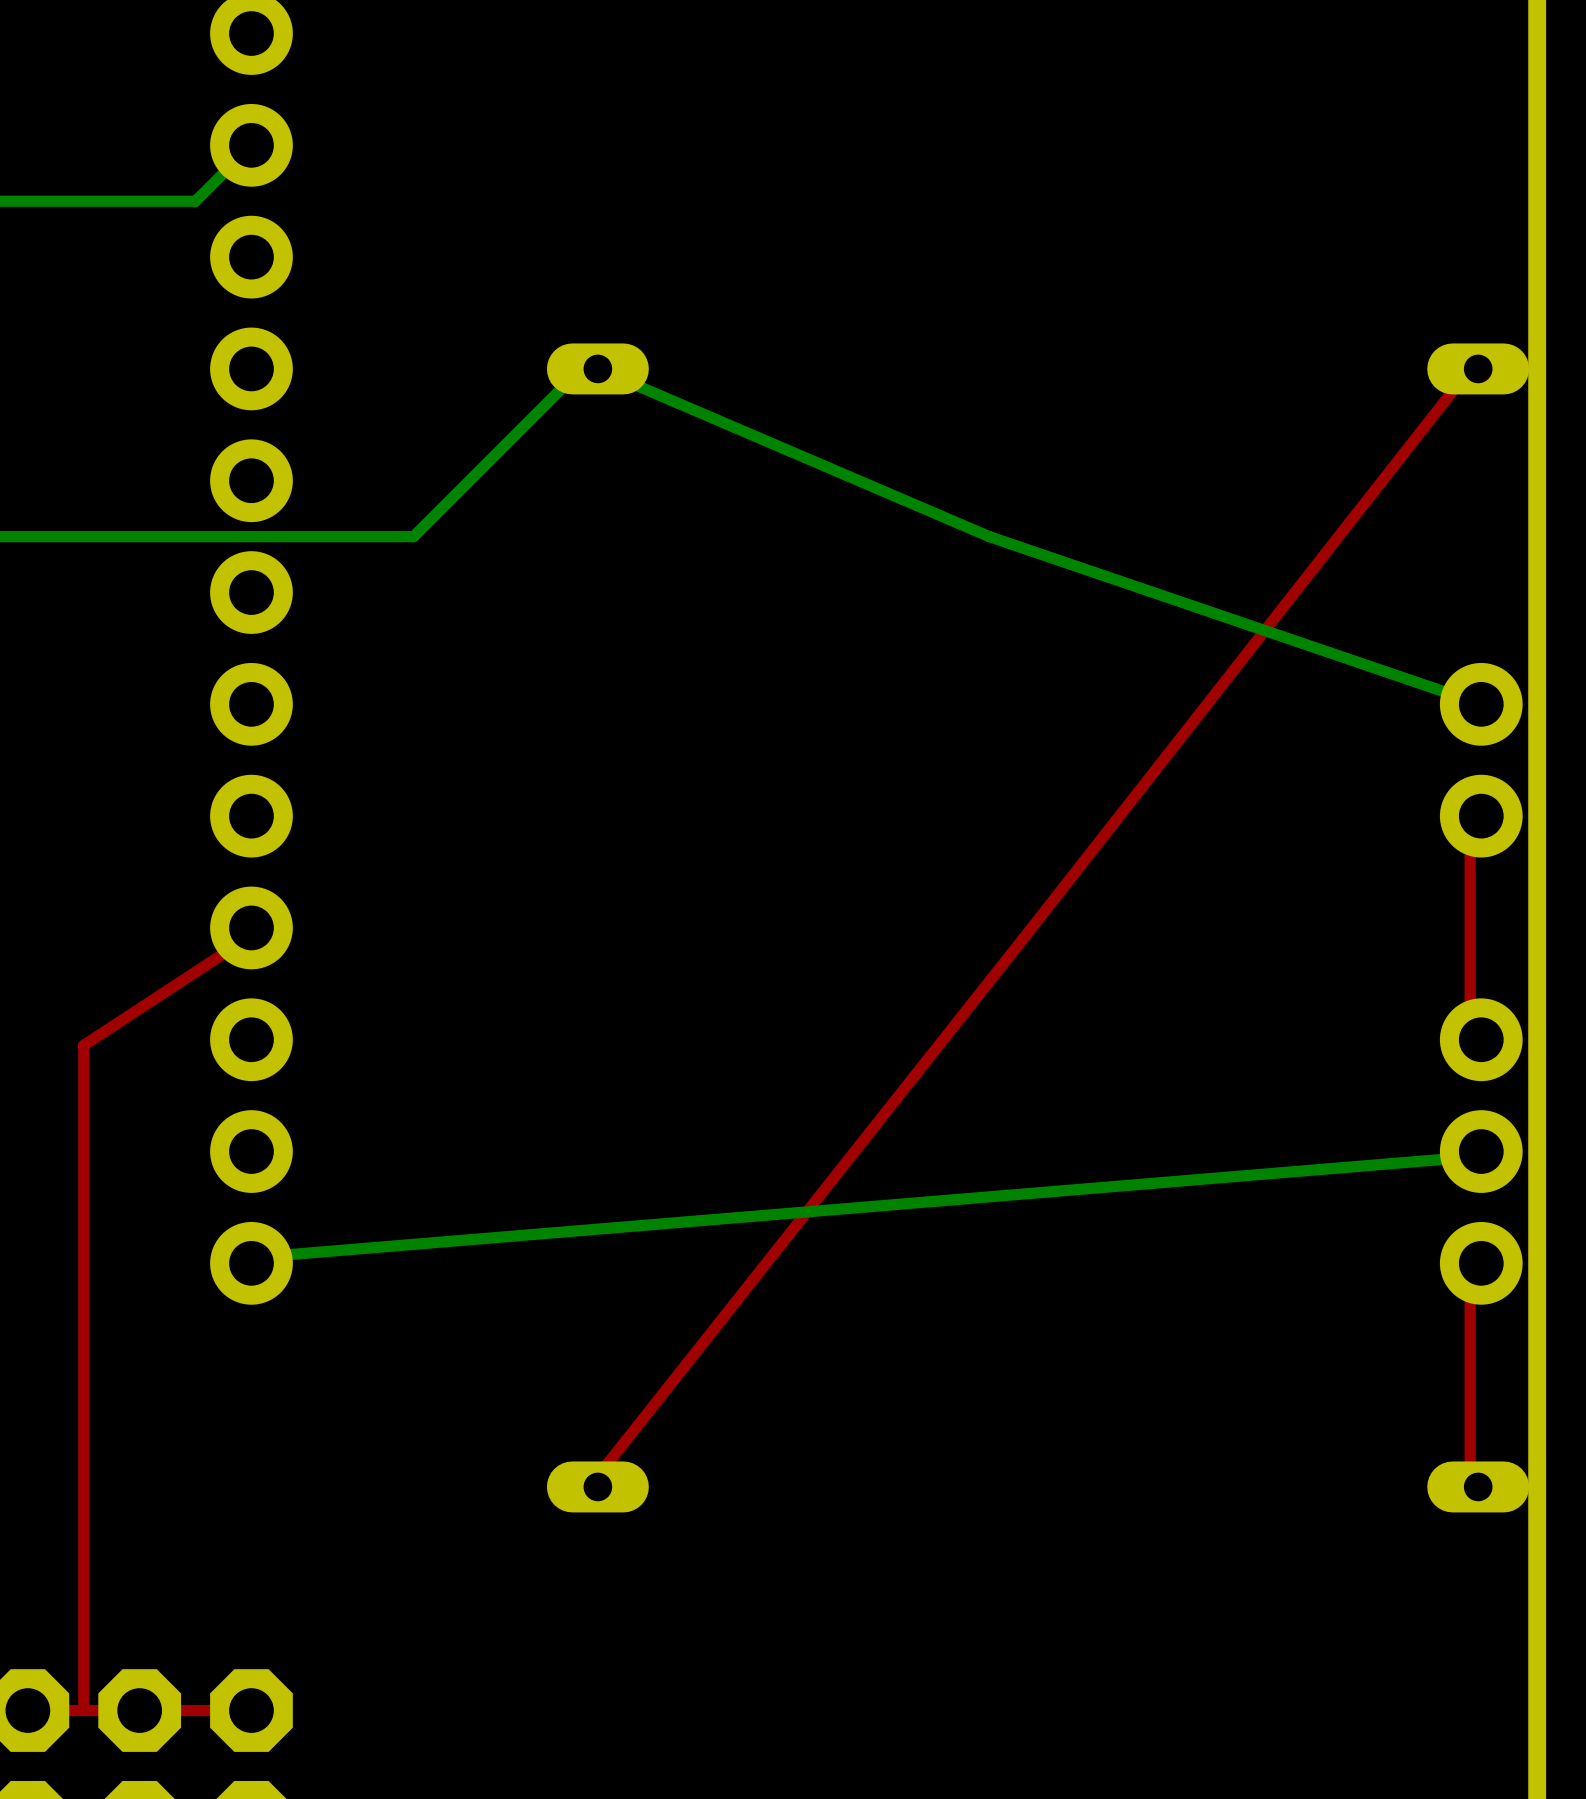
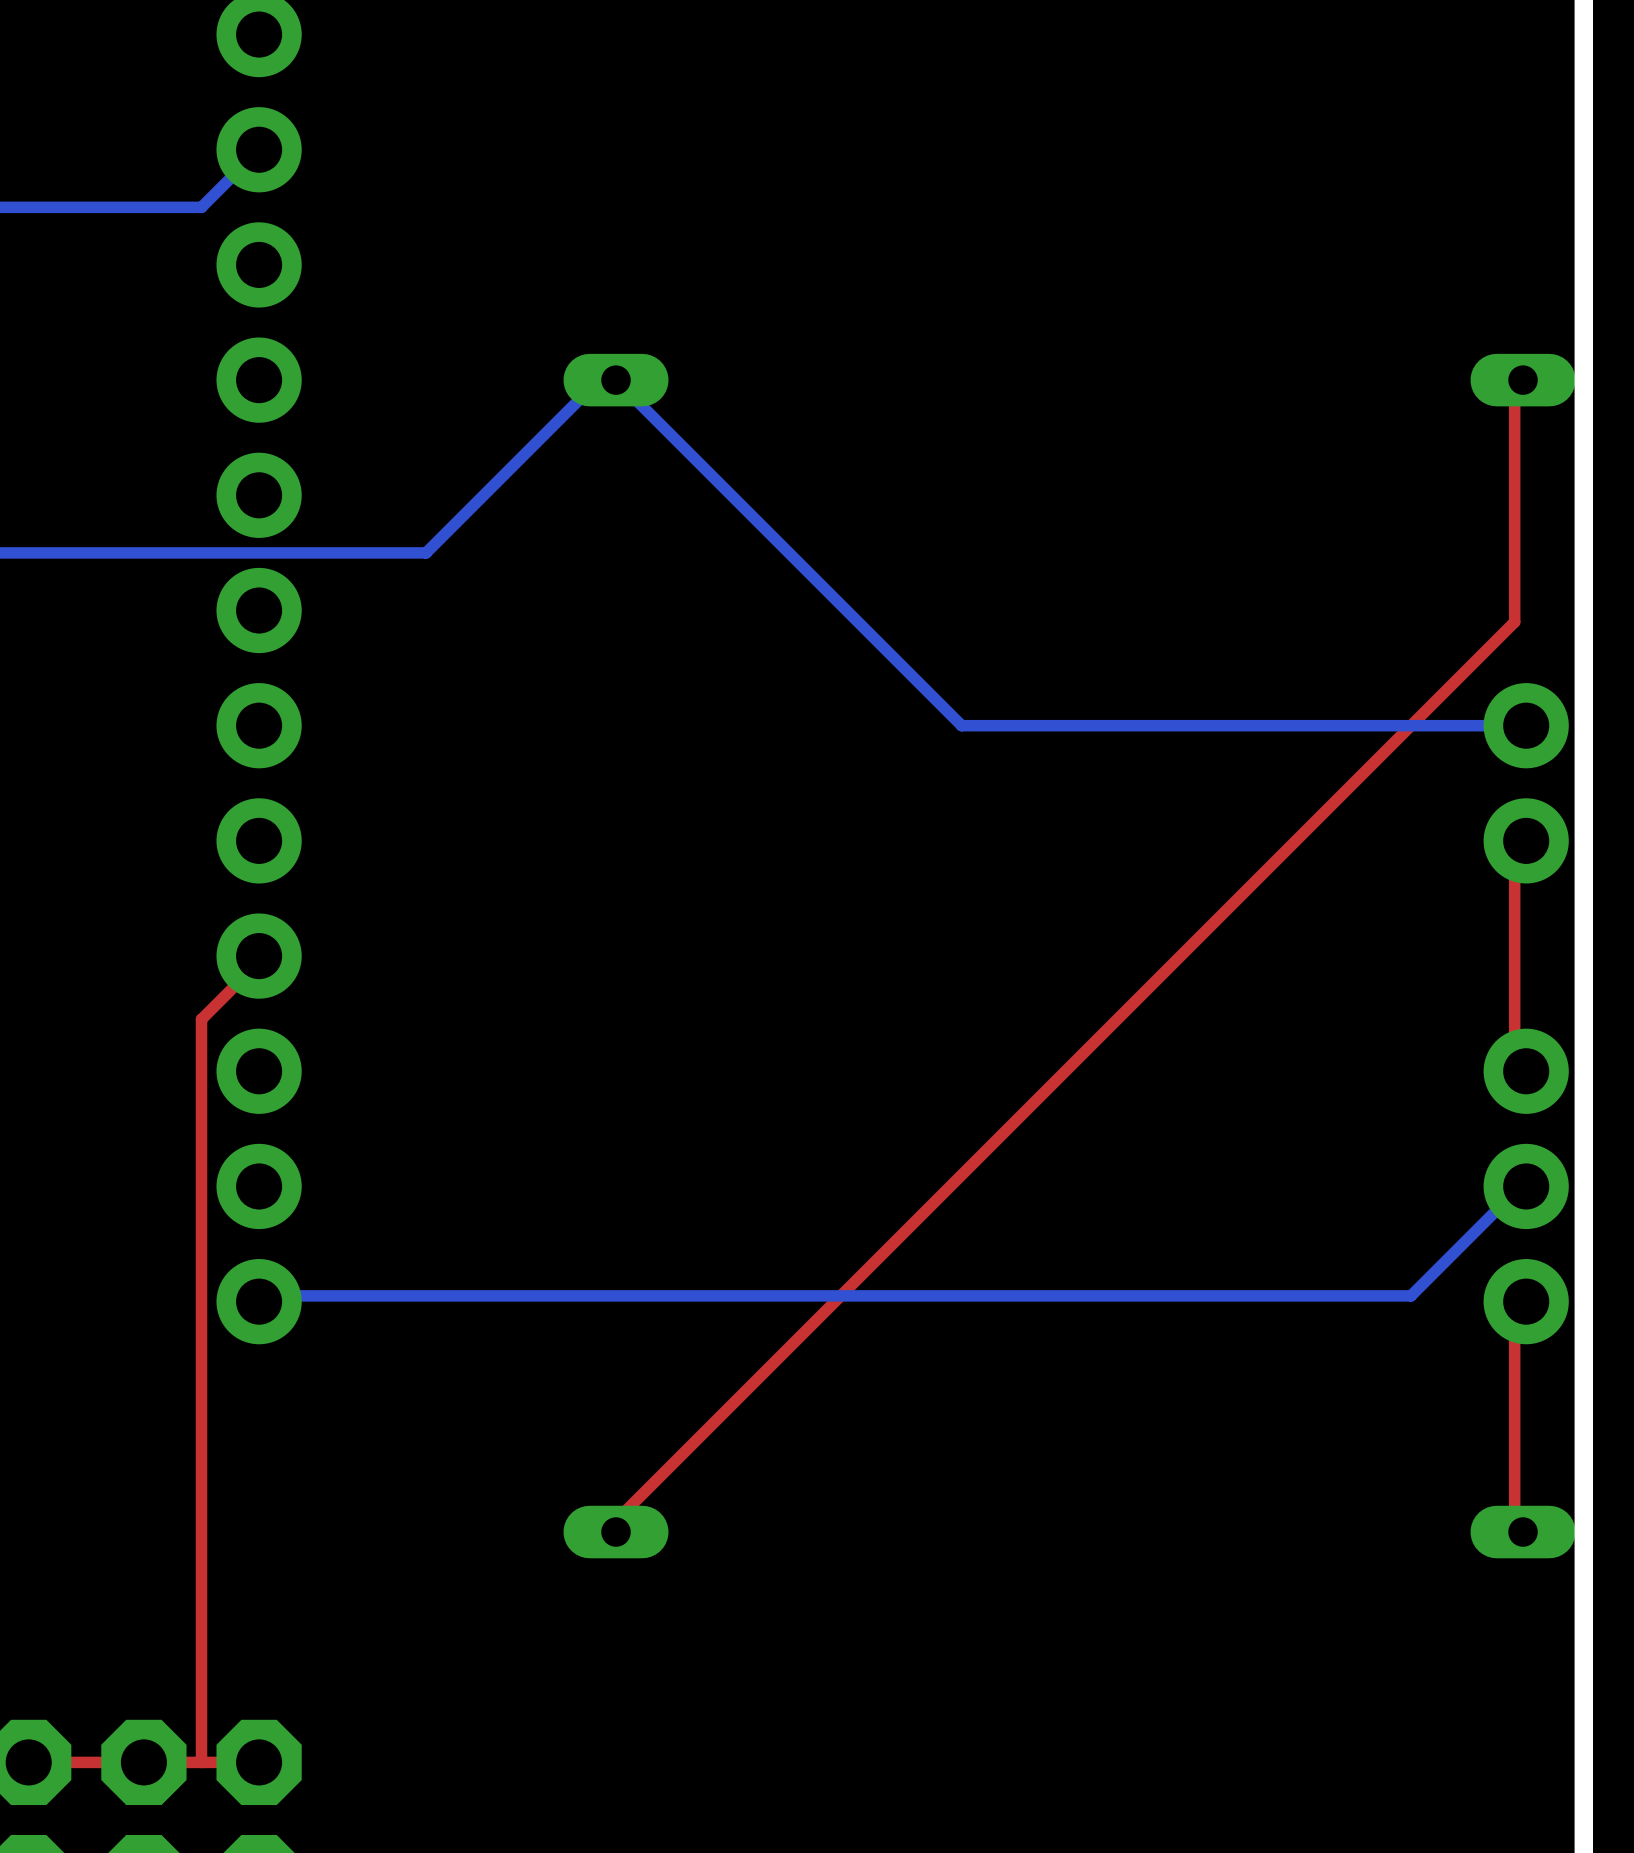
bottom track: (598, 368) (989, 536) (1481, 704) -> (616, 380) (961, 725) (1526, 725)
top track: (1470, 368) (1022, 939) (598, 1475) -> (1514, 380) (1514, 622) (616, 1520)
top track: (245, 939) (83, 1045) (83, 1710) -> (253, 967) (201, 1019) (201, 1762)
bottom track: (1470, 1157) (251, 1257) (262, 1257) -> (1514, 1192) (1411, 1295) (270, 1295)

